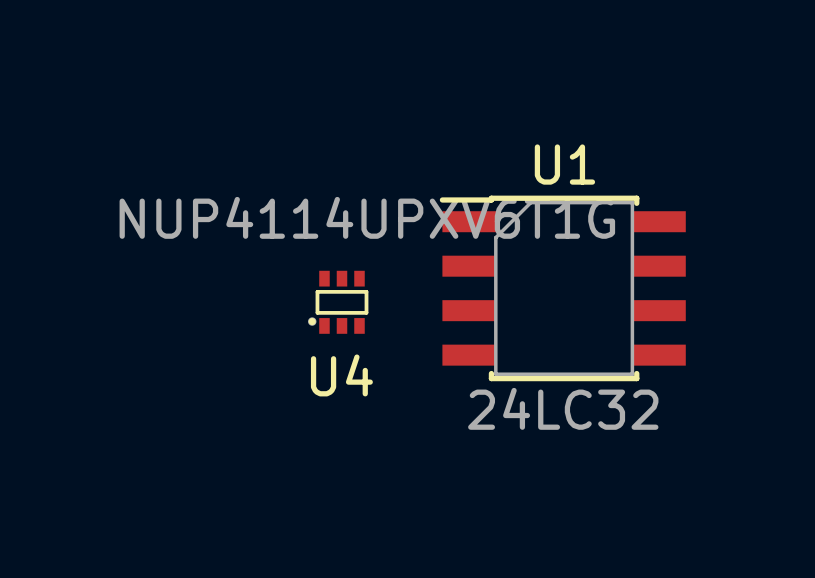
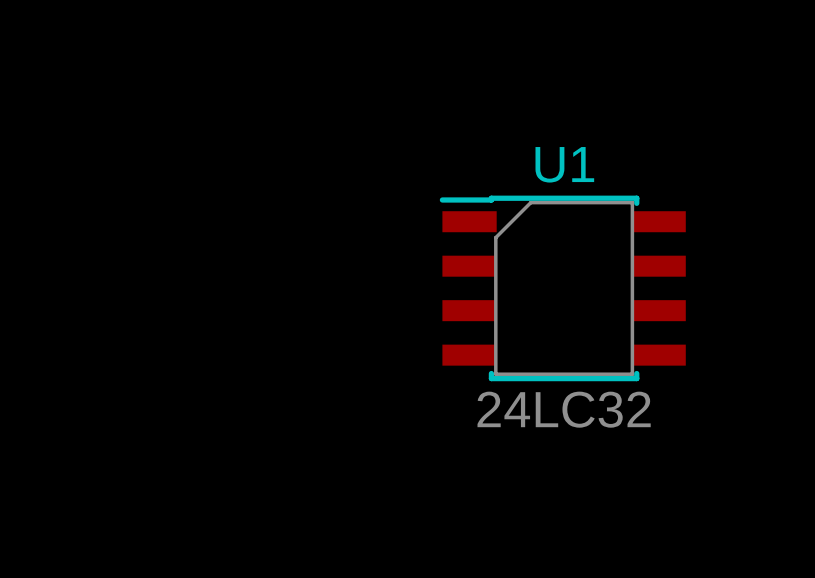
U4: NUP4114UPXV6T1G (338, 302) -> none

